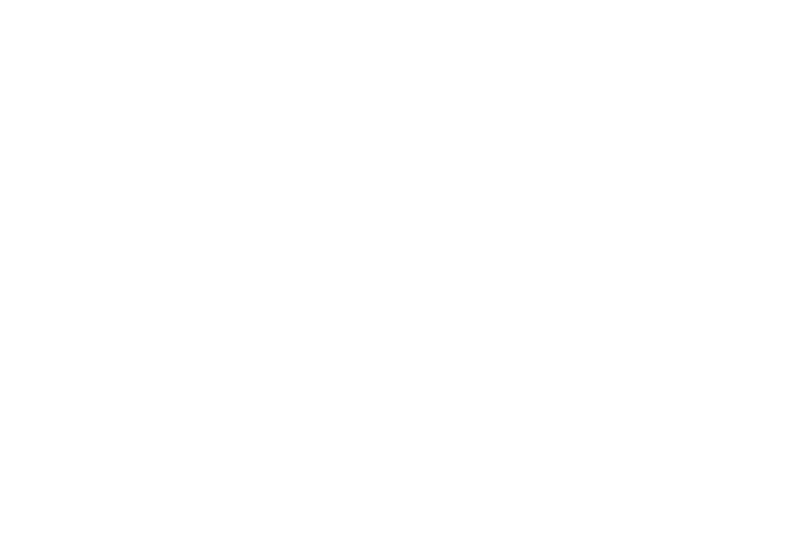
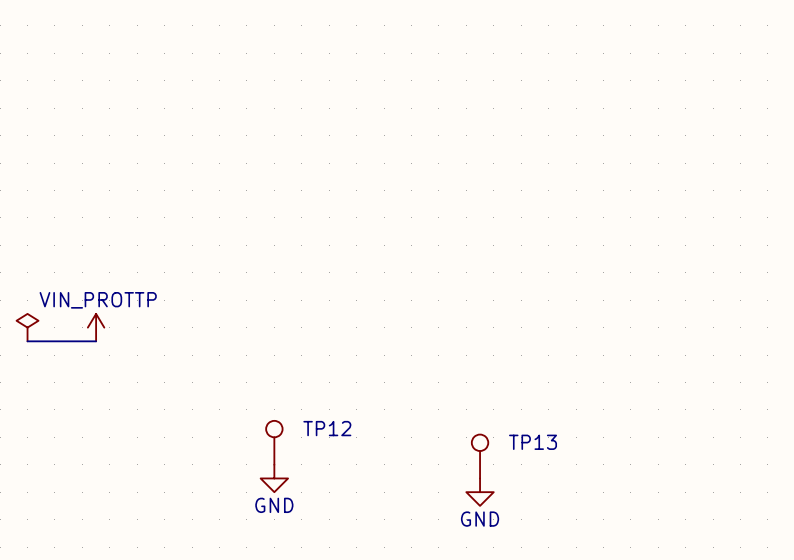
power symbol: none -> (27, 327)
power symbol: none -> VIN_PROTTP (96, 327)
wire: none -> (27, 341) (96, 341)
TP12: none -> (274, 442)
TP13: none -> (480, 456)
power symbol: none -> GND (274, 478)
power symbol: none -> GND (480, 492)

